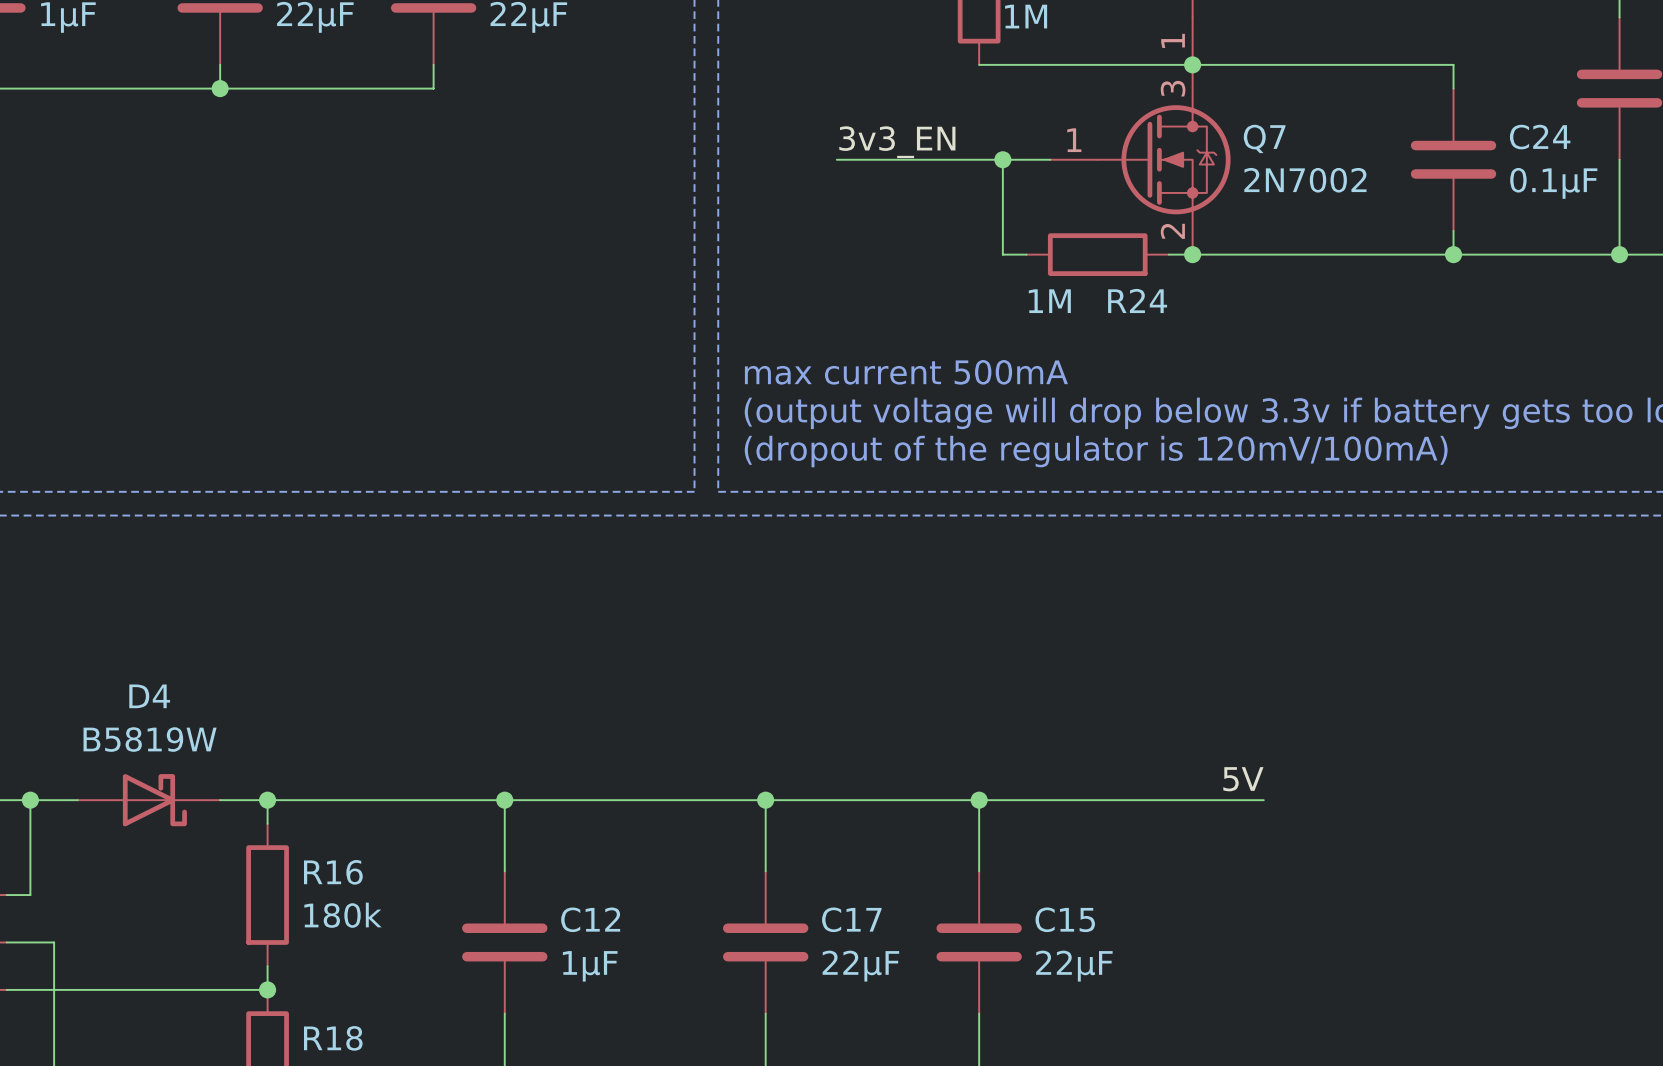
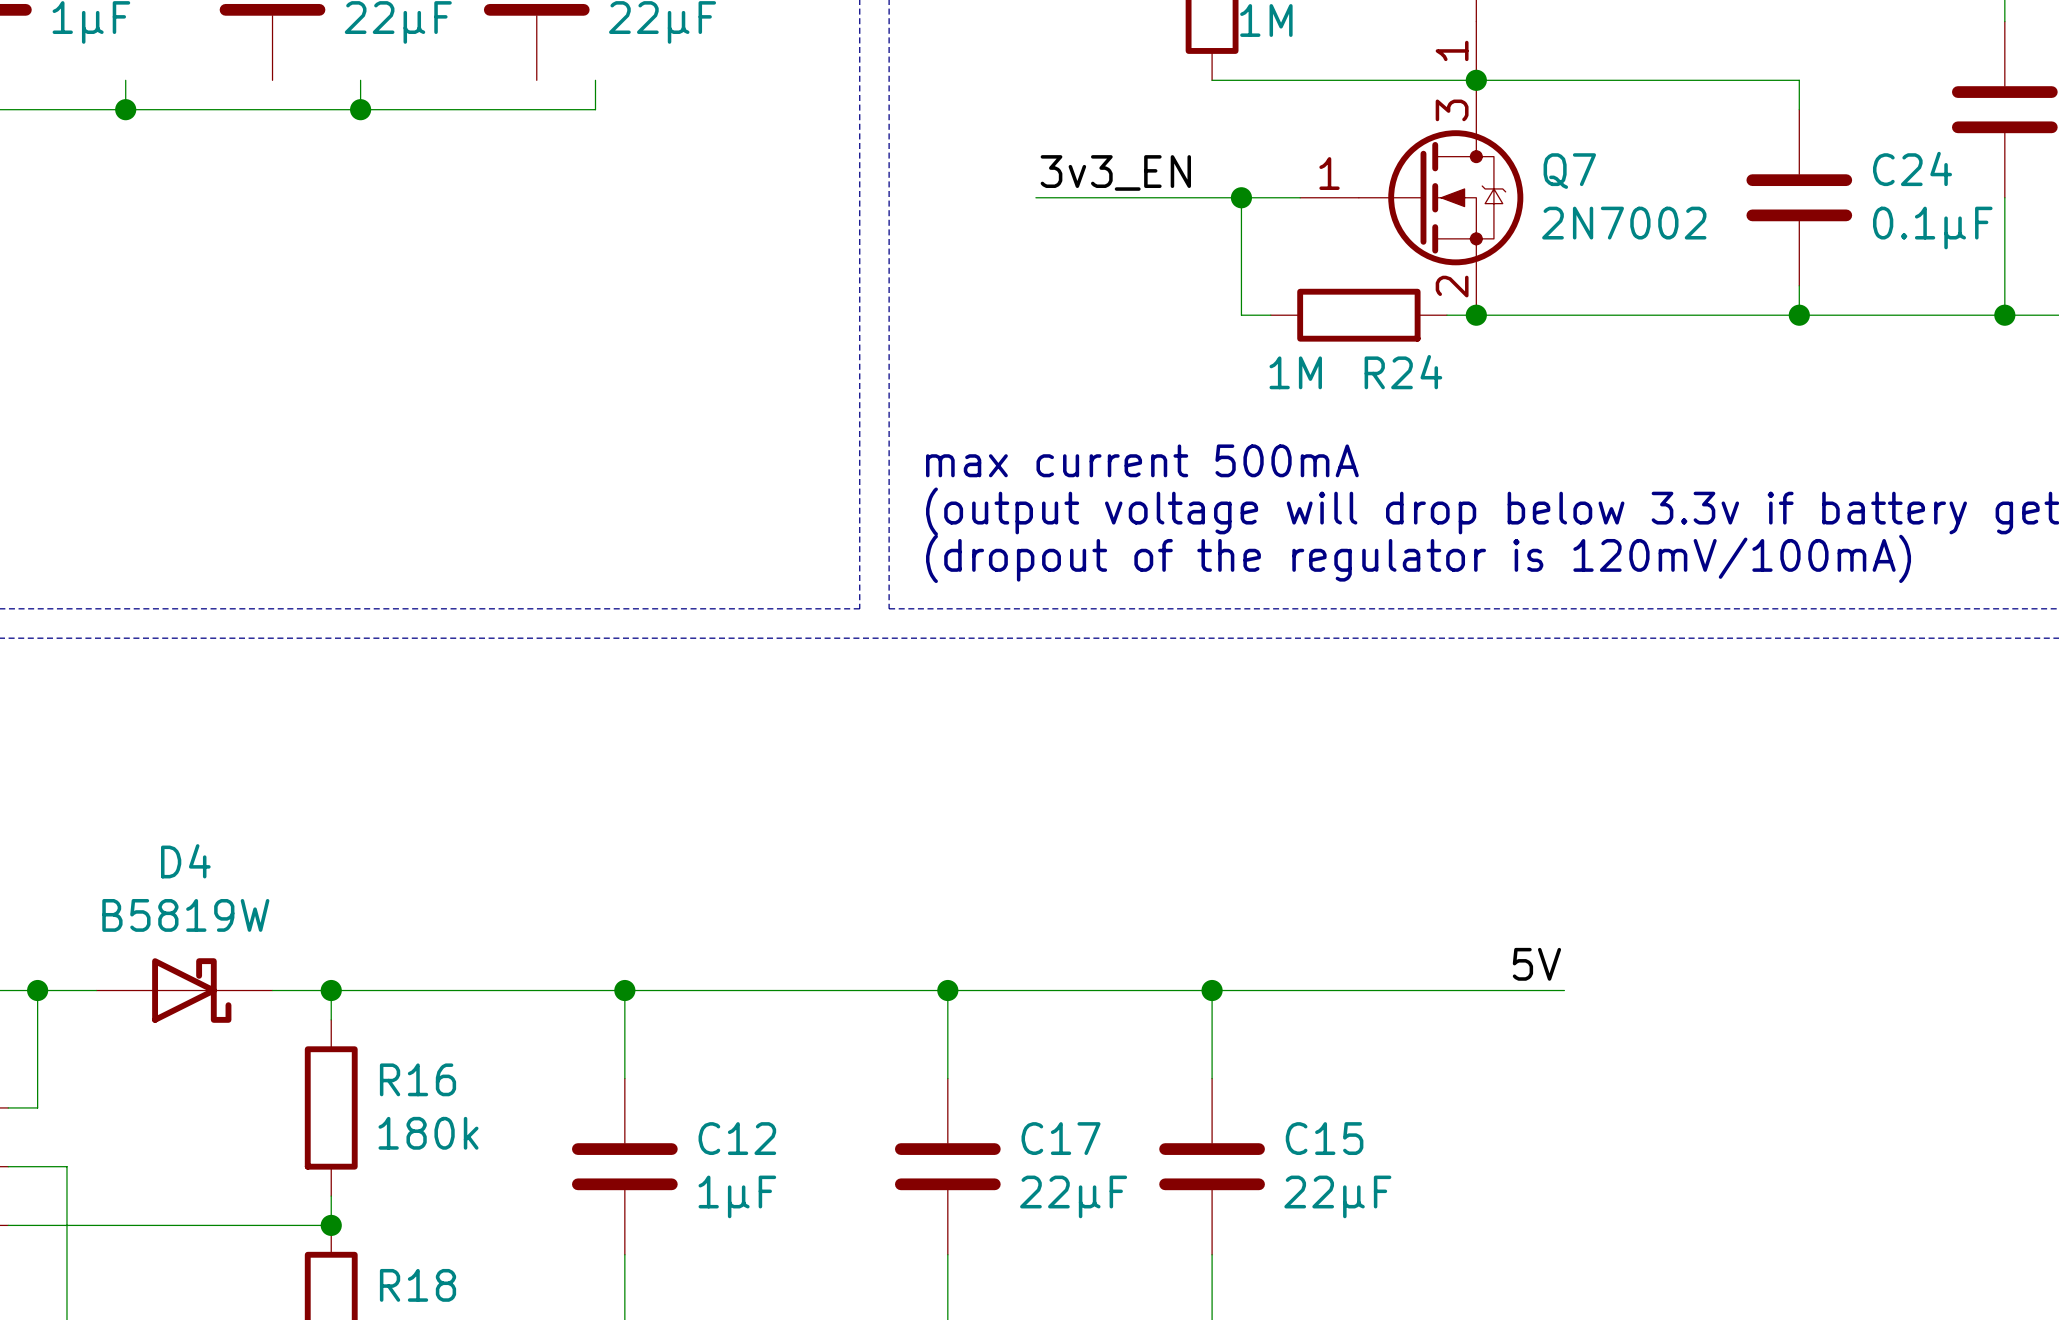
wire: none -> (125, 80) (125, 109)
wire: (220, 64) (220, 88) -> (360, 80) (360, 109)
wire: (433, 64) (433, 88) -> (595, 80) (595, 109) (536, 109)
junction: none -> (125, 109)
junction: (220, 88) -> none
junction: none -> (360, 109)

